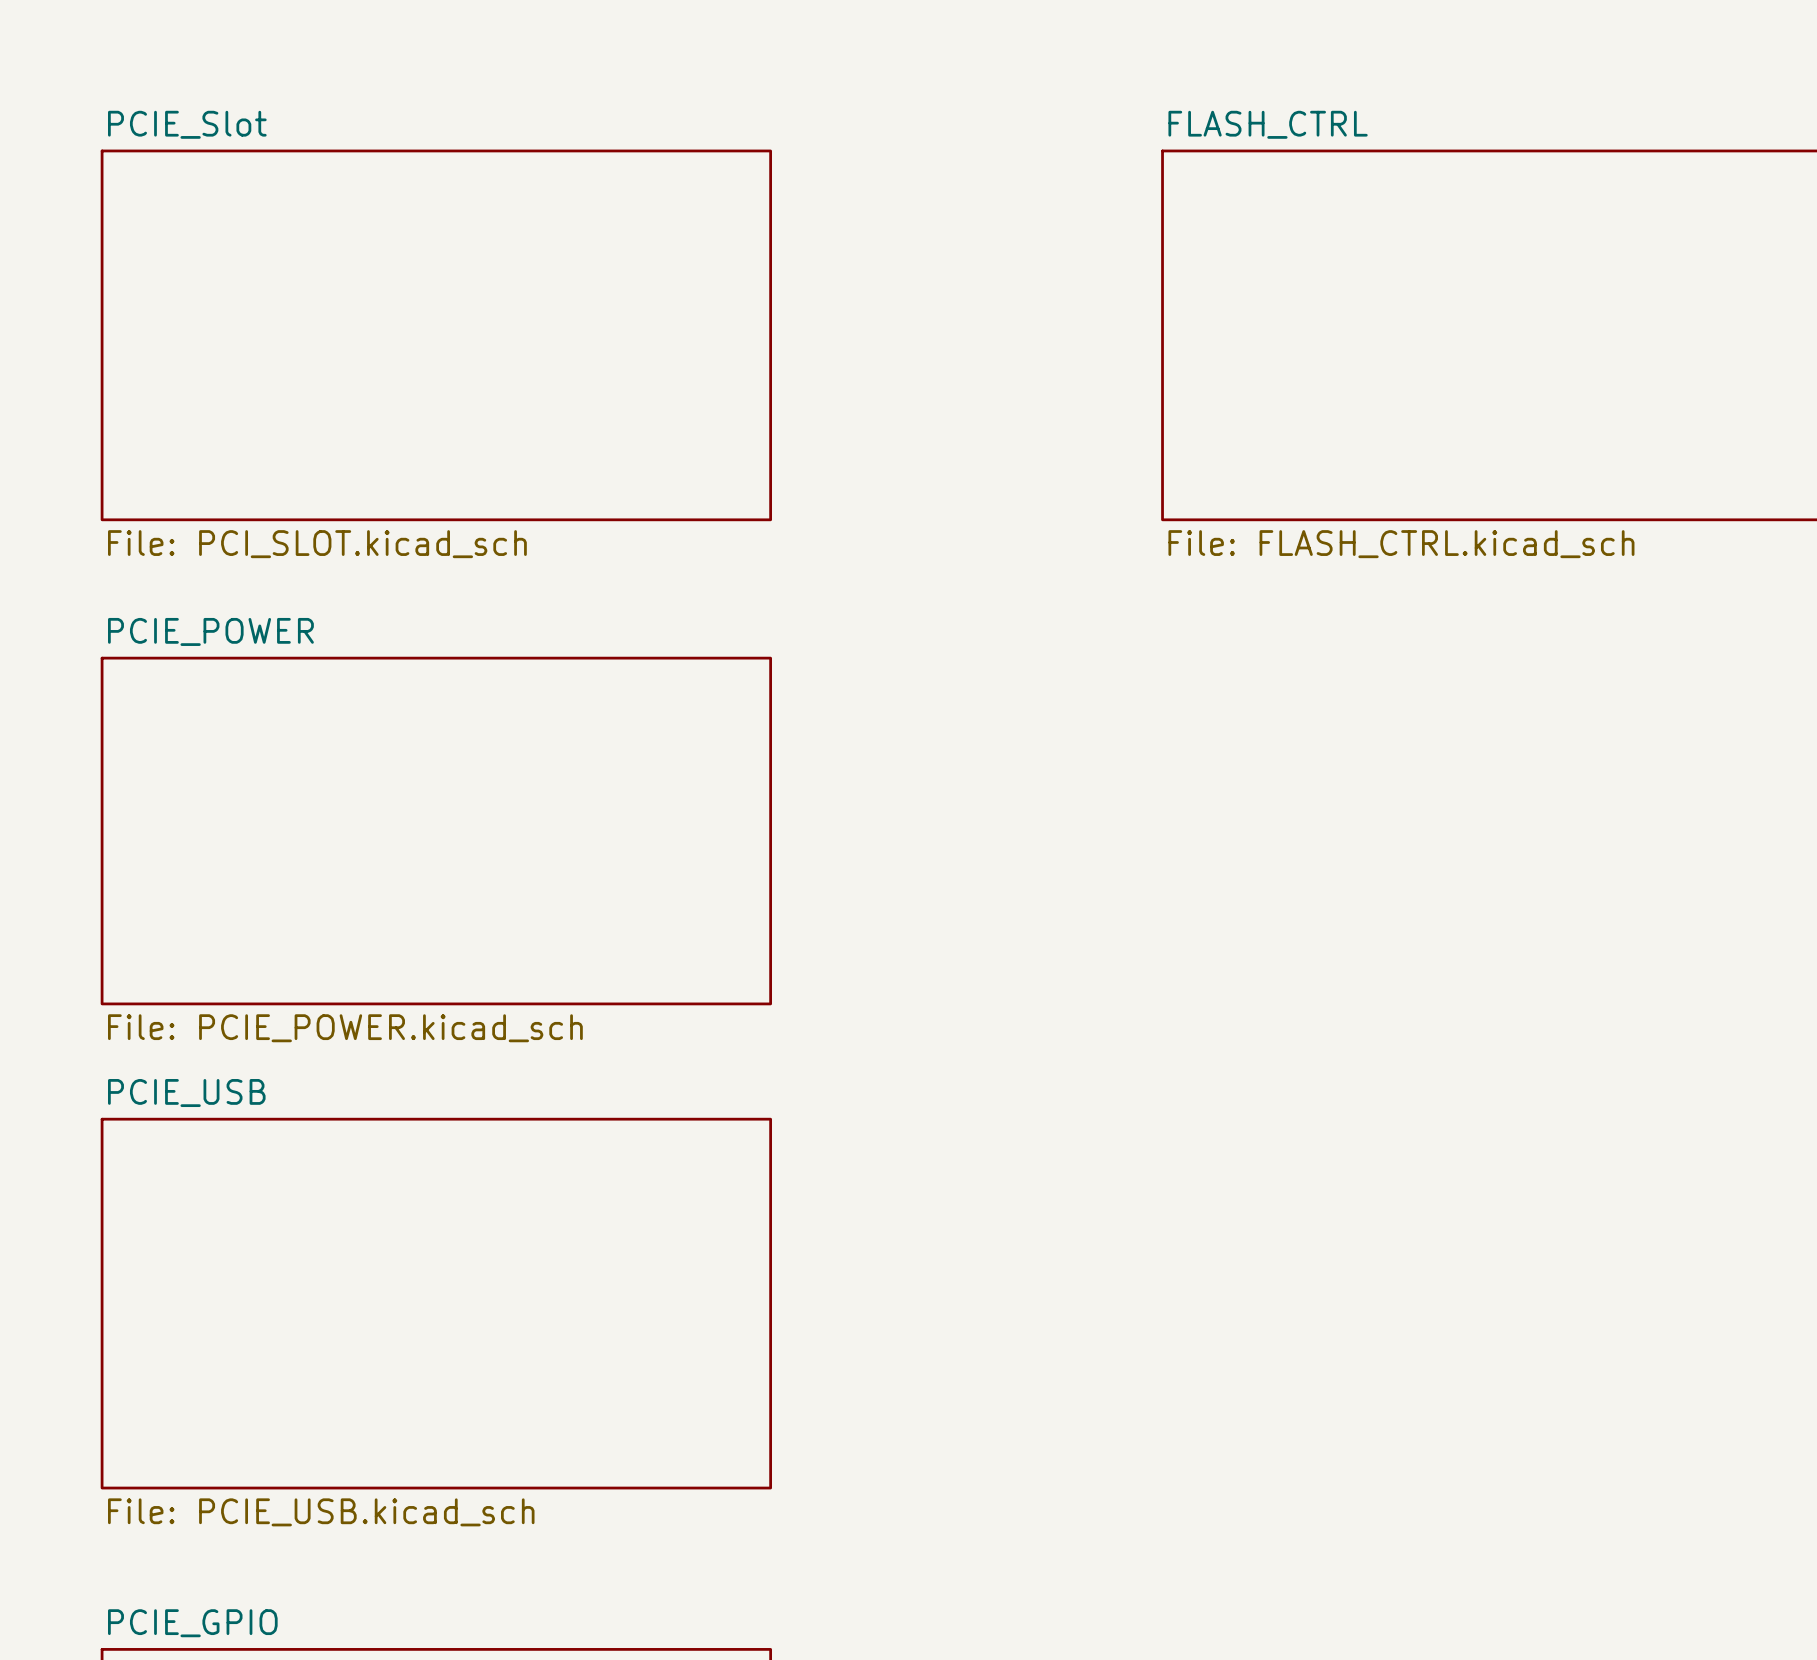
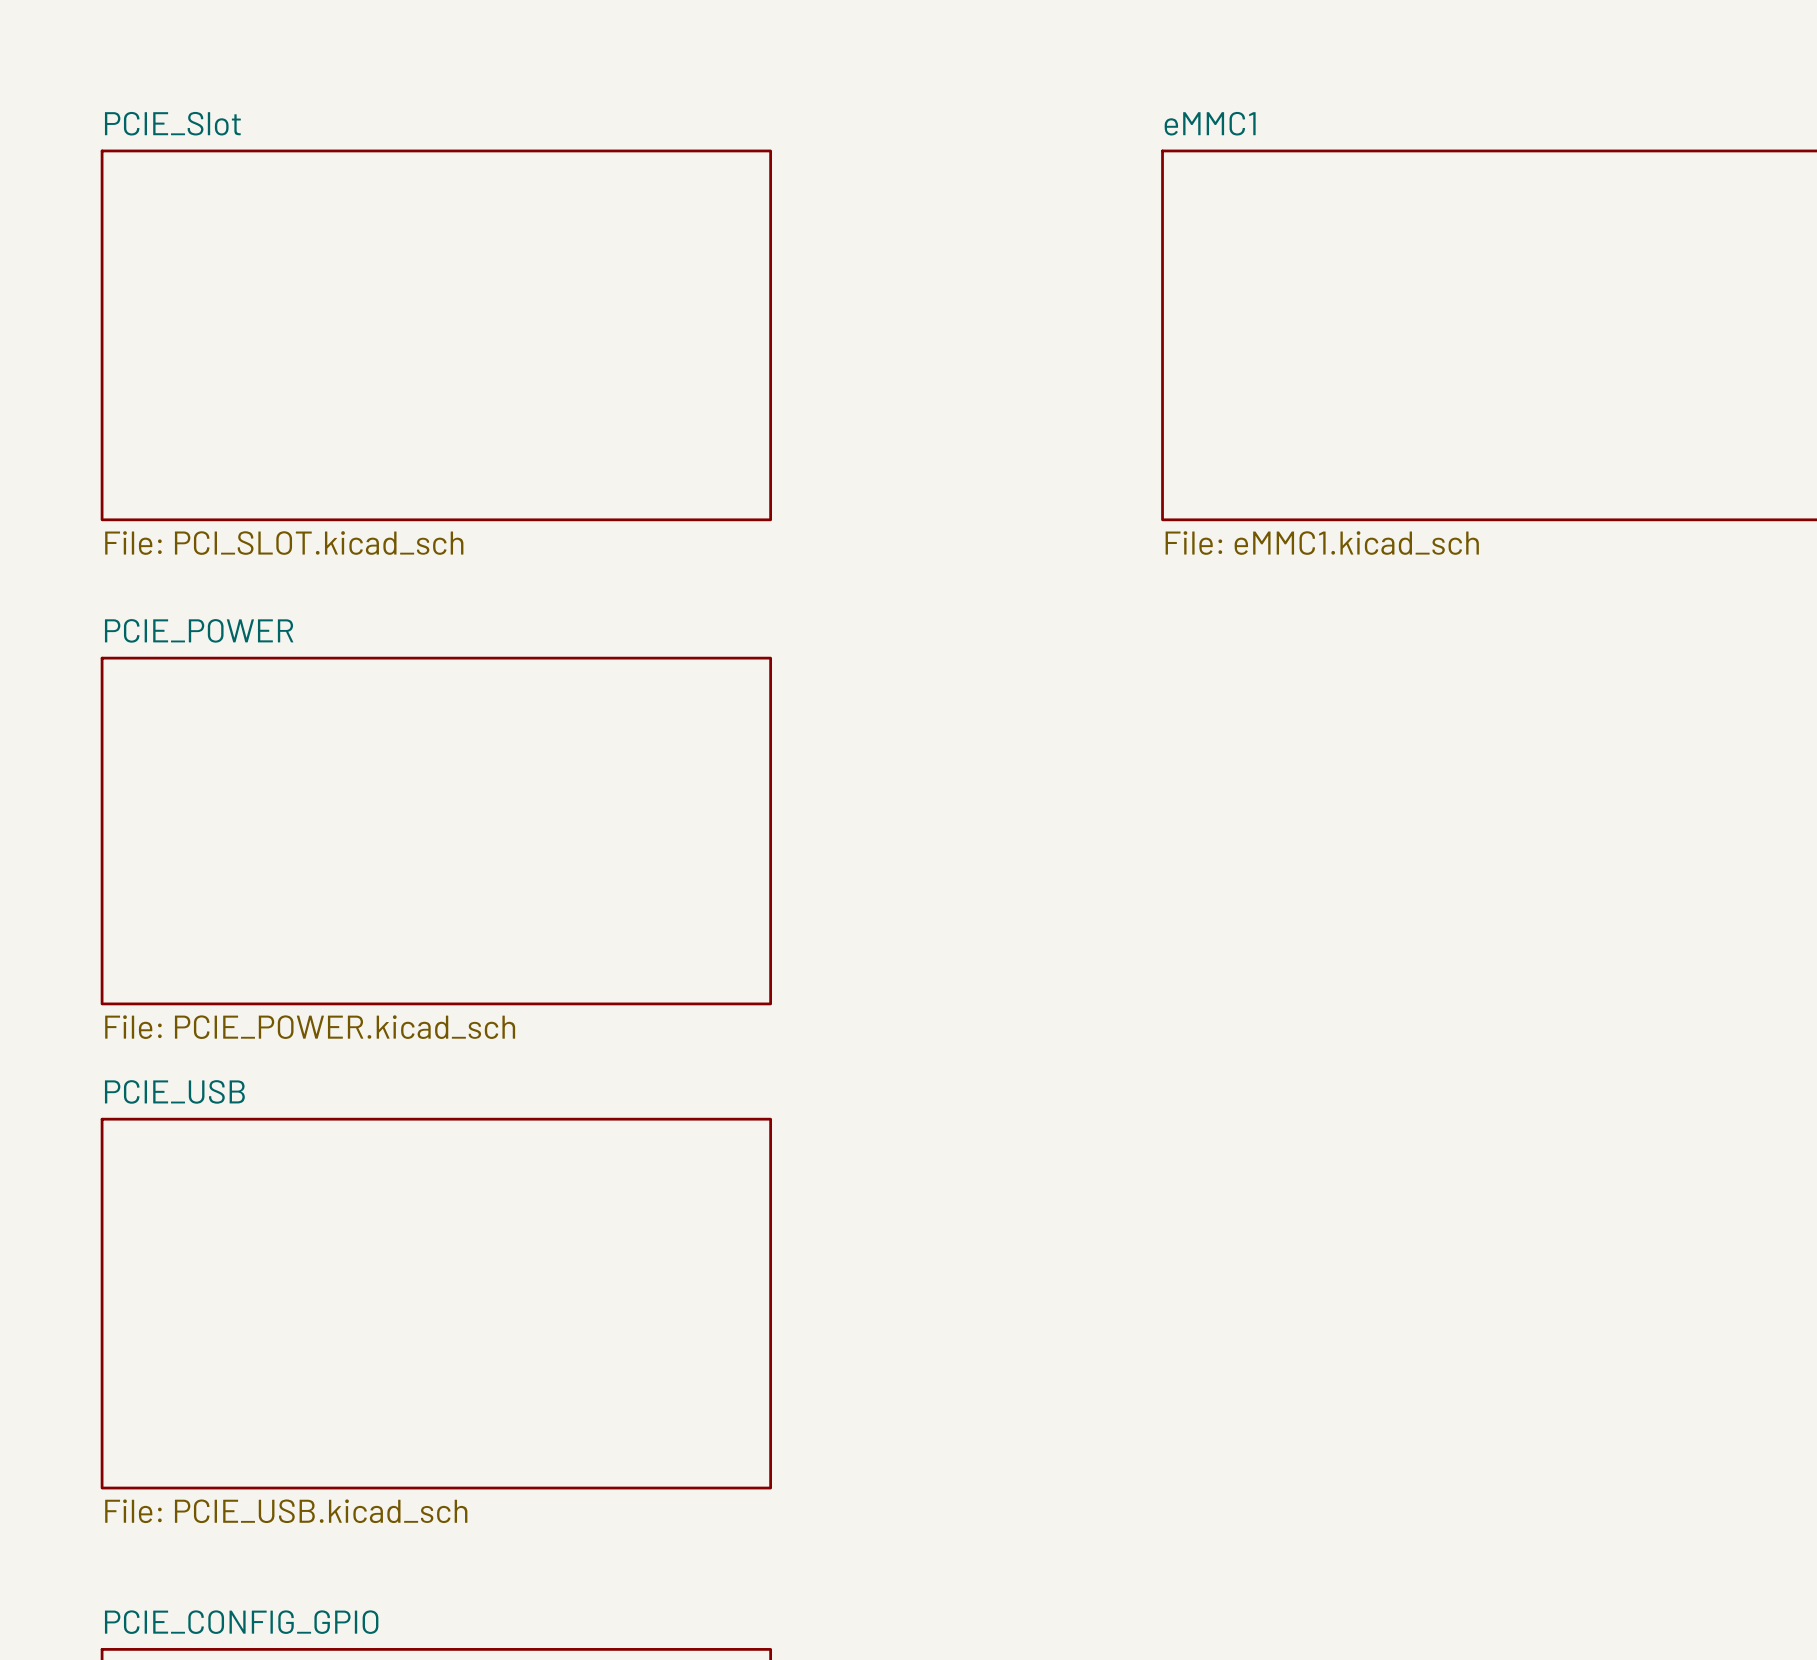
sheet FLASH_CTRL name: FLASH_CTRL (1268, 124) -> eMMC1 (1210, 123)
sheet FLASH_CTRL value: File: FLASH_CTRL.kicad_sch (1401, 544) -> File: eMMC1.kicad_sch (1322, 543)
sheet PCIE_GPIO name: PCIE_GPIO (192, 1623) -> PCIE_CONFIG_GPIO (241, 1622)

